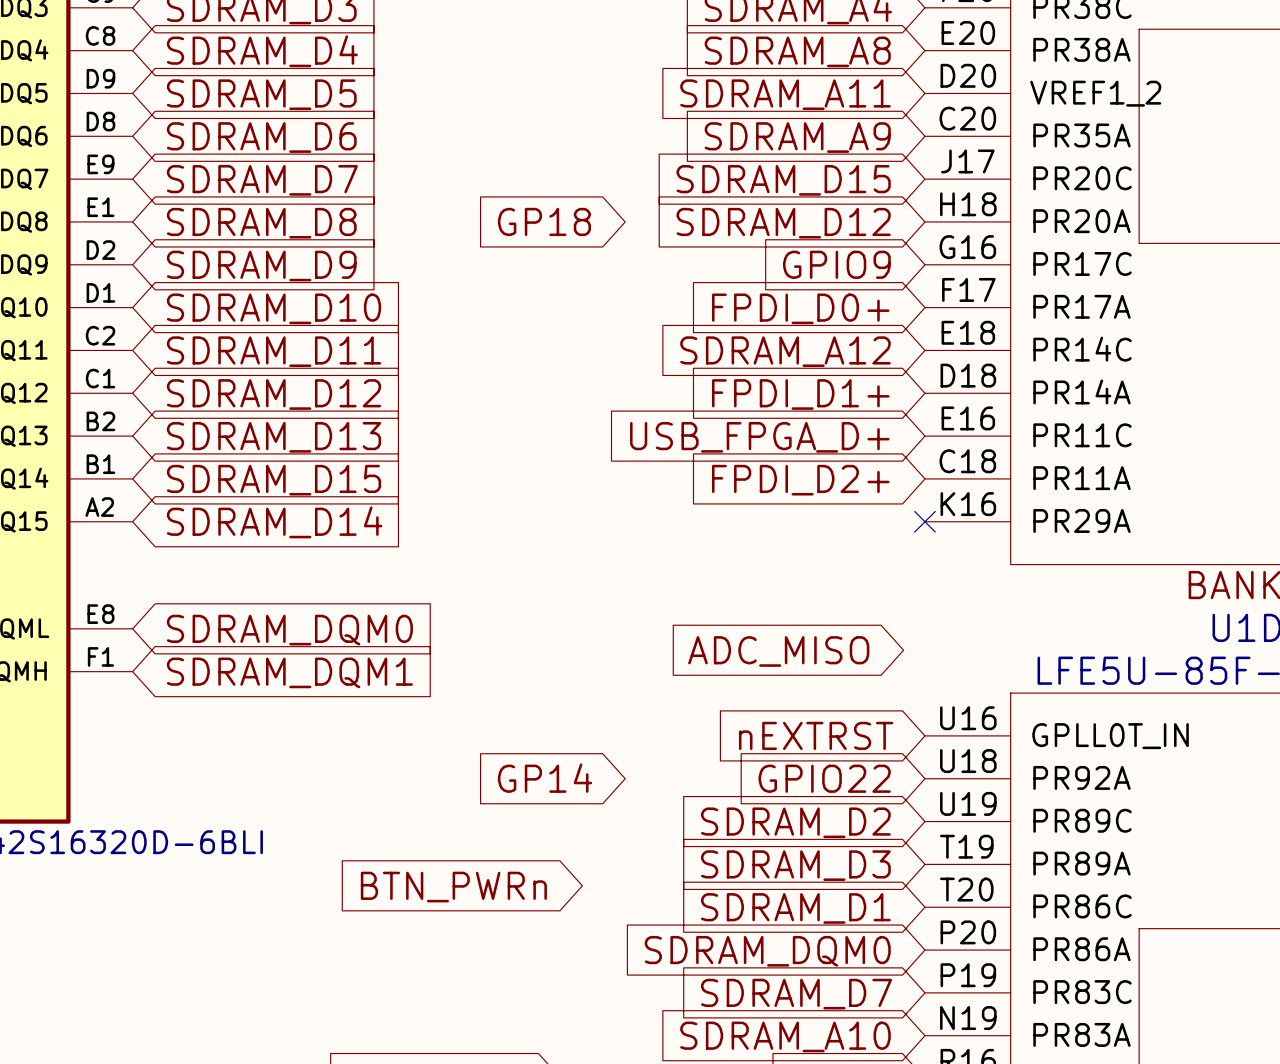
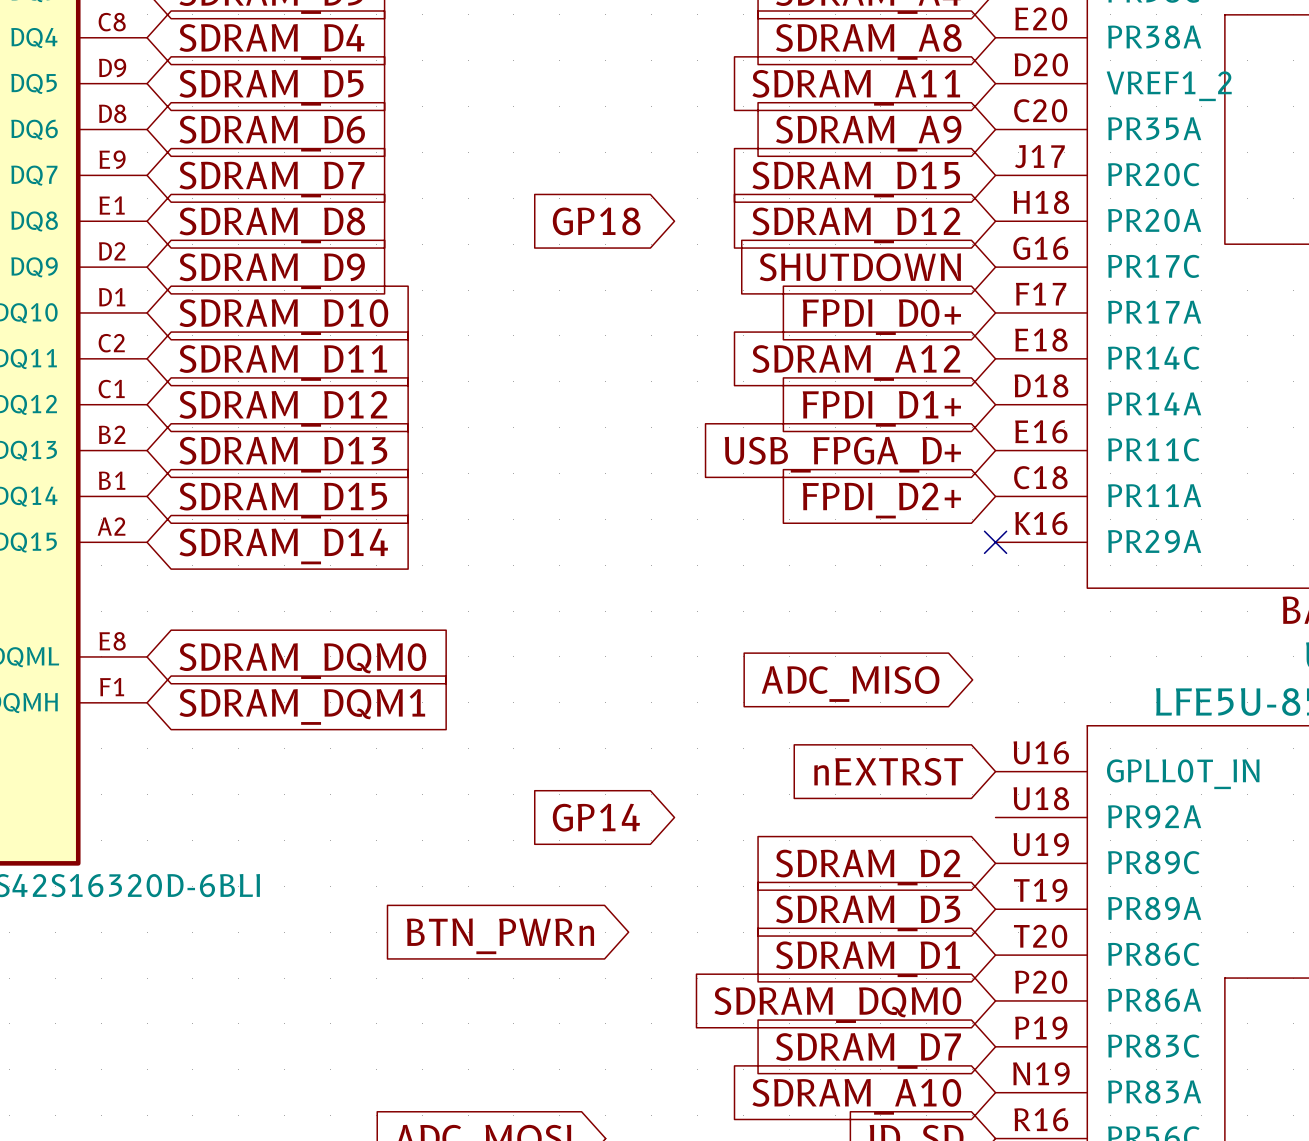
global label: GPIO9 (836, 264) -> SHUTDOWN (860, 267)
global label: GPIO22 (824, 778) -> none

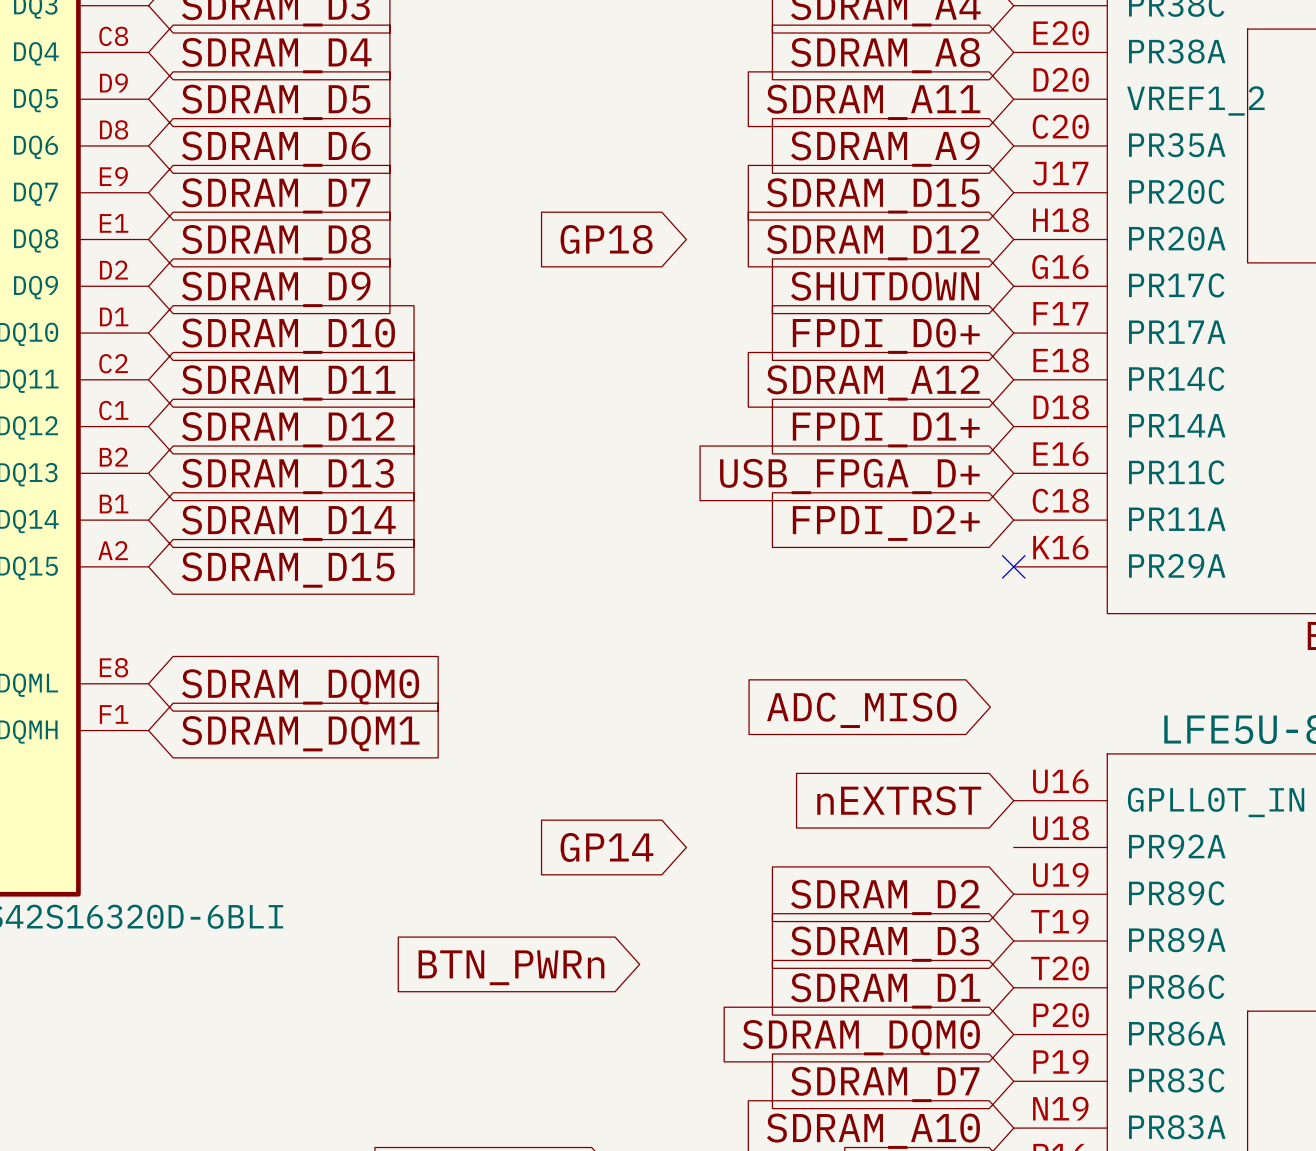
global label: SDRAM_D15 (283, 500) -> SDRAM_D14 (288, 523)
global label: SDRAM_D14 (283, 546) -> SDRAM_D15 (288, 570)

